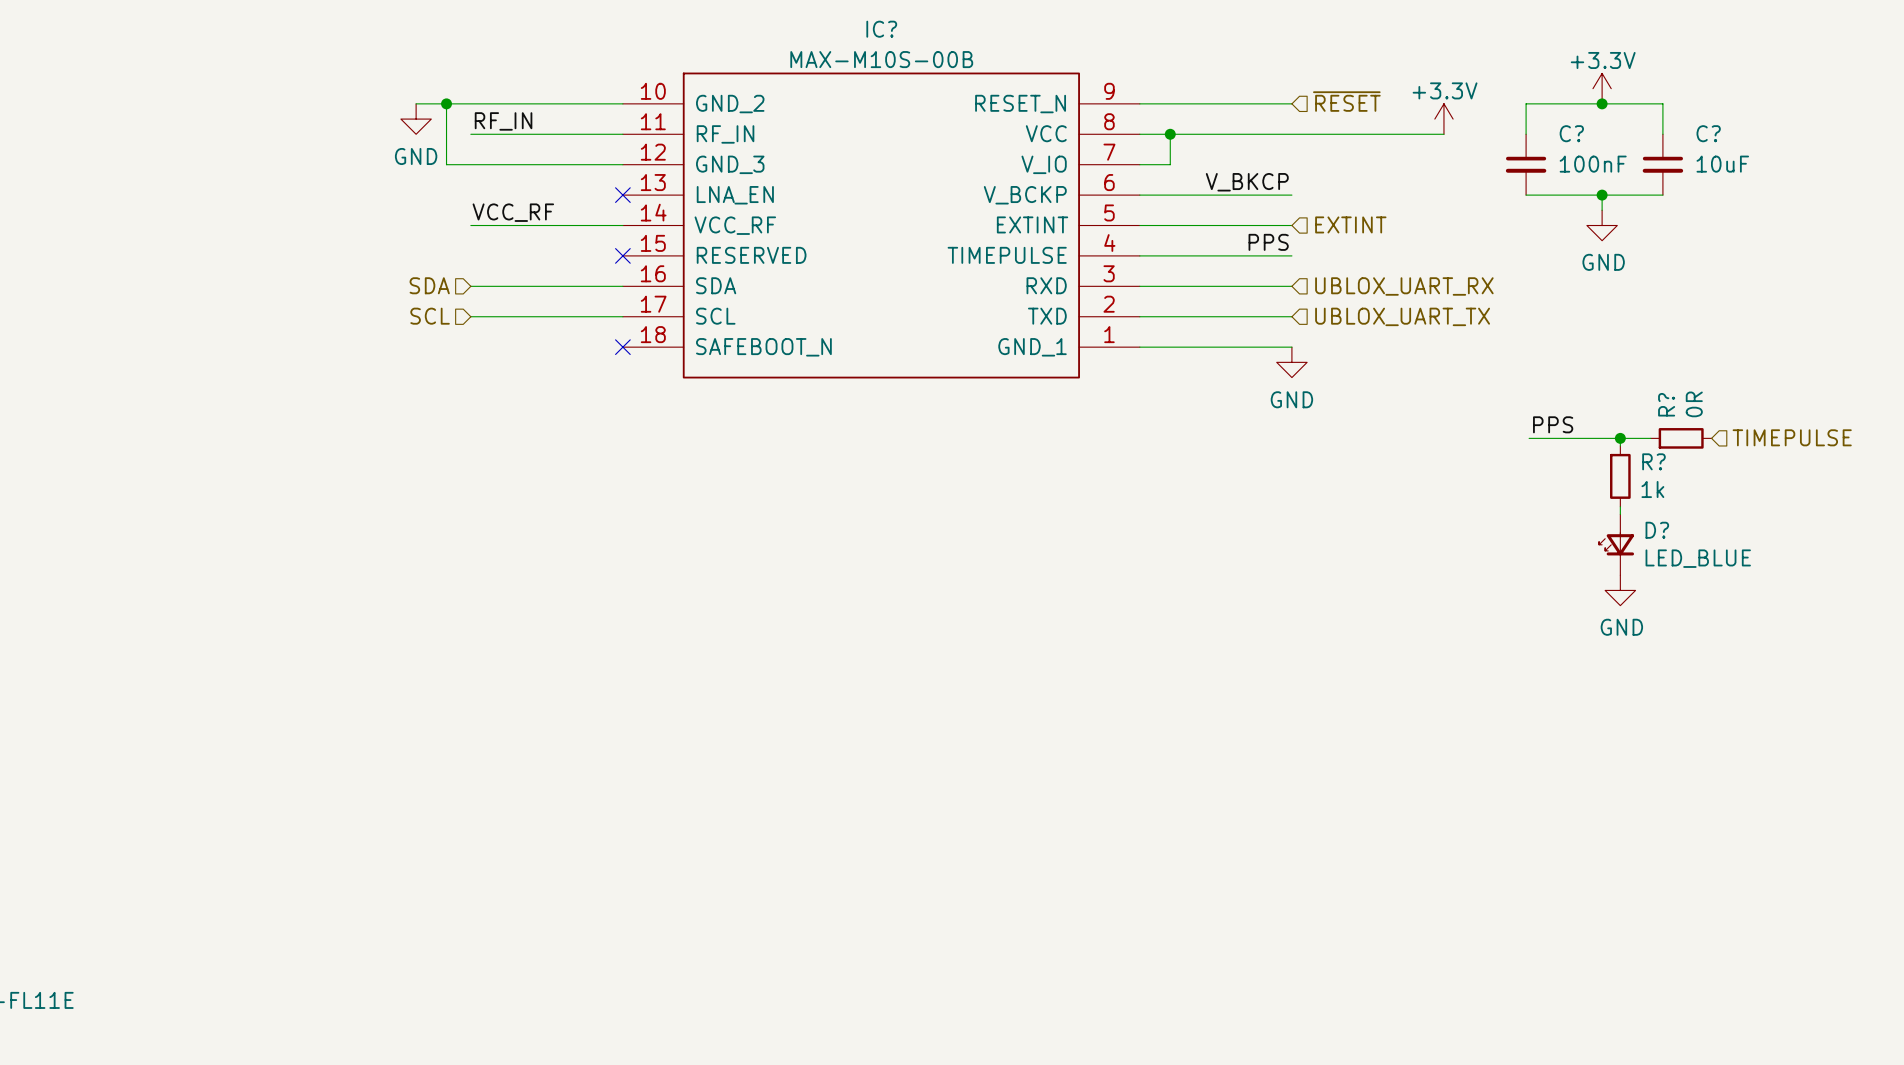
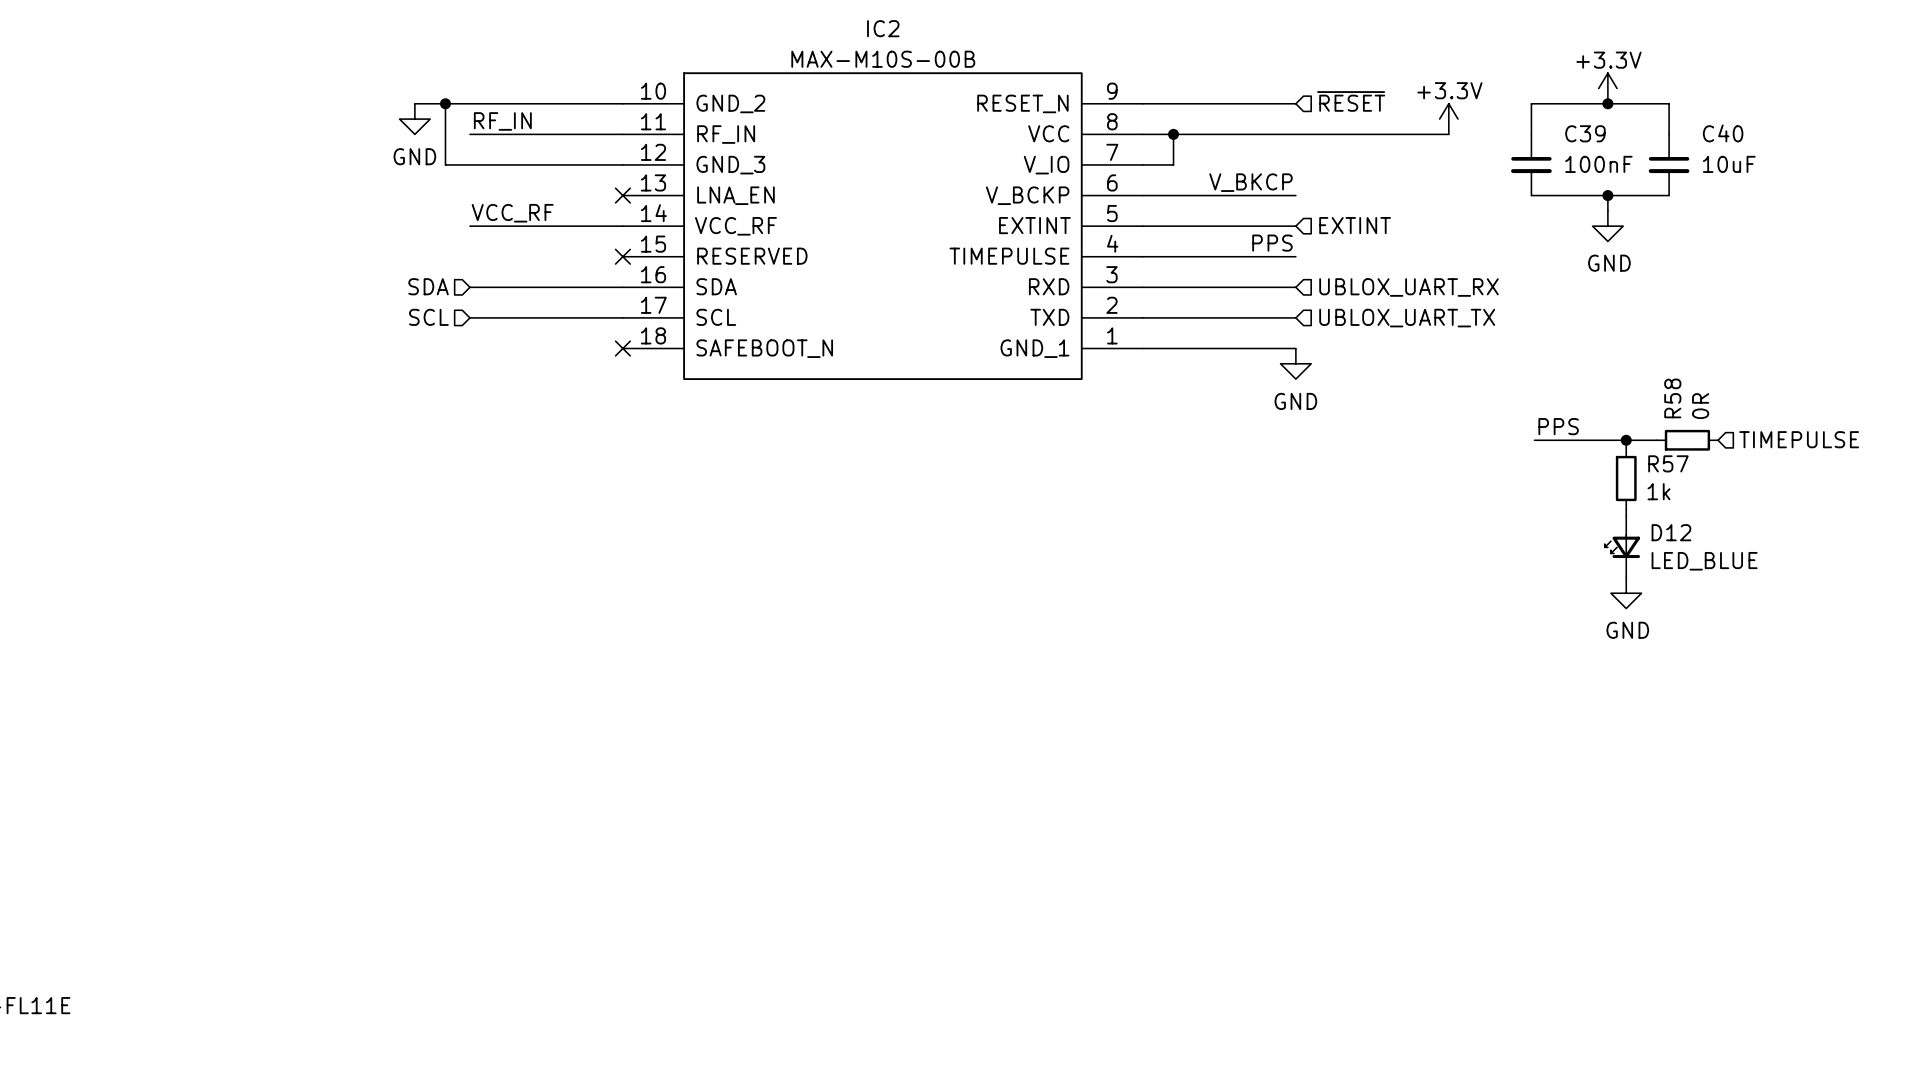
IC? name: IC? (881, 29) -> IC2 (883, 28)
C? name: C? (1571, 133) -> C39 (1585, 133)
C? name: C? (1708, 133) -> C40 (1723, 133)
R? name: R? (1666, 404) -> R58 (1672, 398)
R? name: R? (1653, 461) -> R57 (1668, 463)
D? name: D? (1657, 530) -> D12 (1671, 532)

